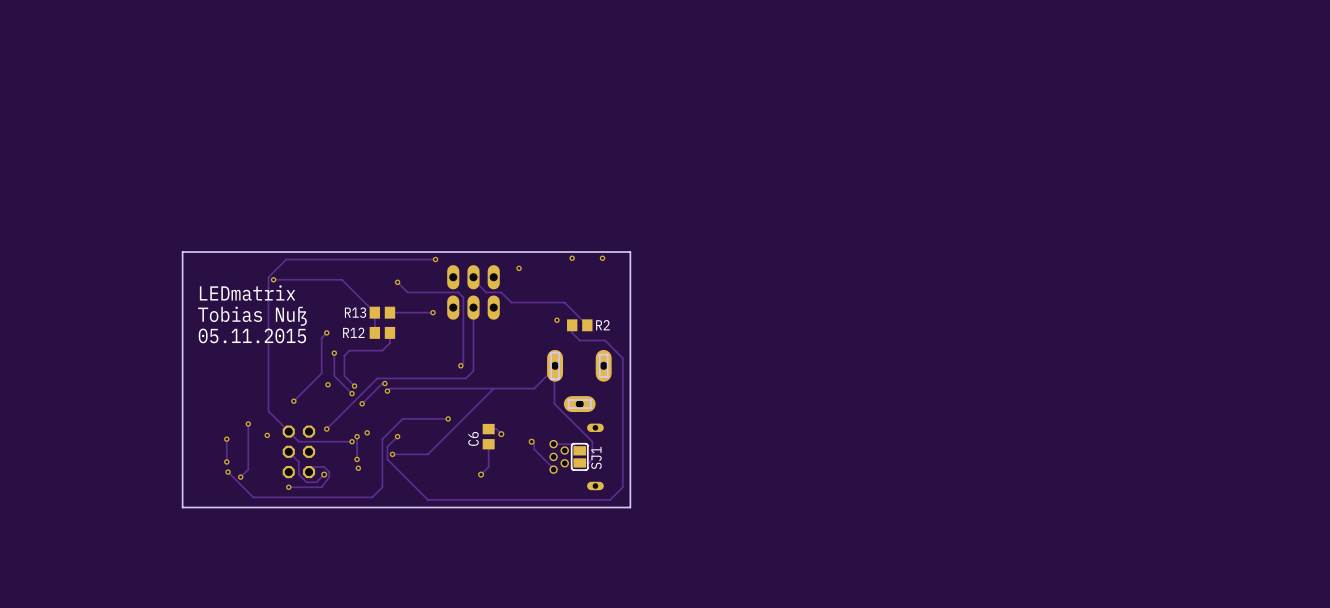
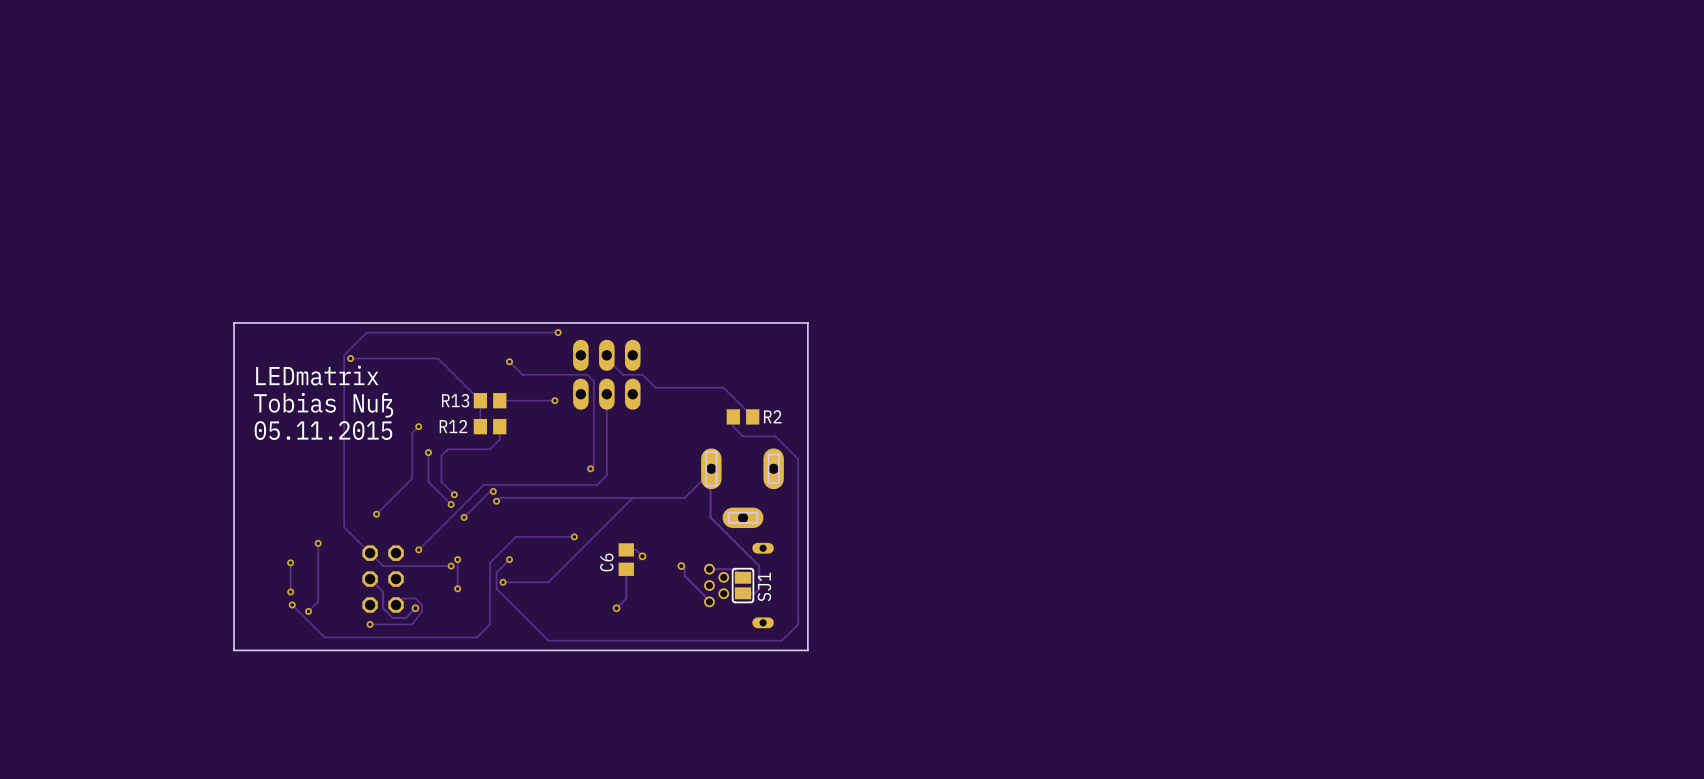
via: (572, 258) -> none
via: (602, 258) -> none
via: (519, 268) -> none
via: (556, 320) -> none
via: (328, 384) -> none
via: (367, 432) -> none
via: (267, 435) -> none
via: (358, 468) -> none

